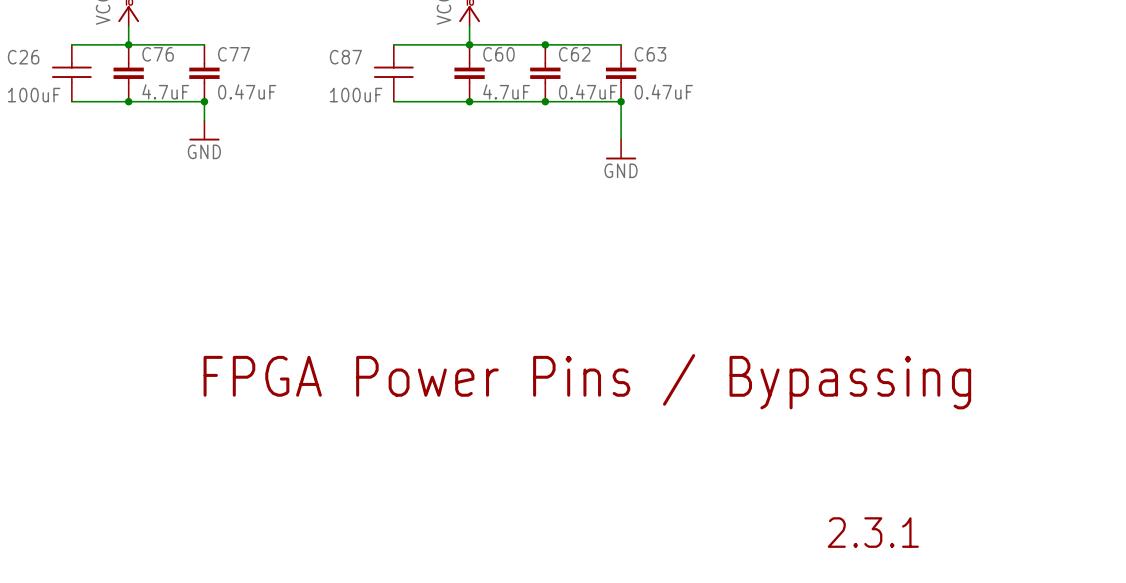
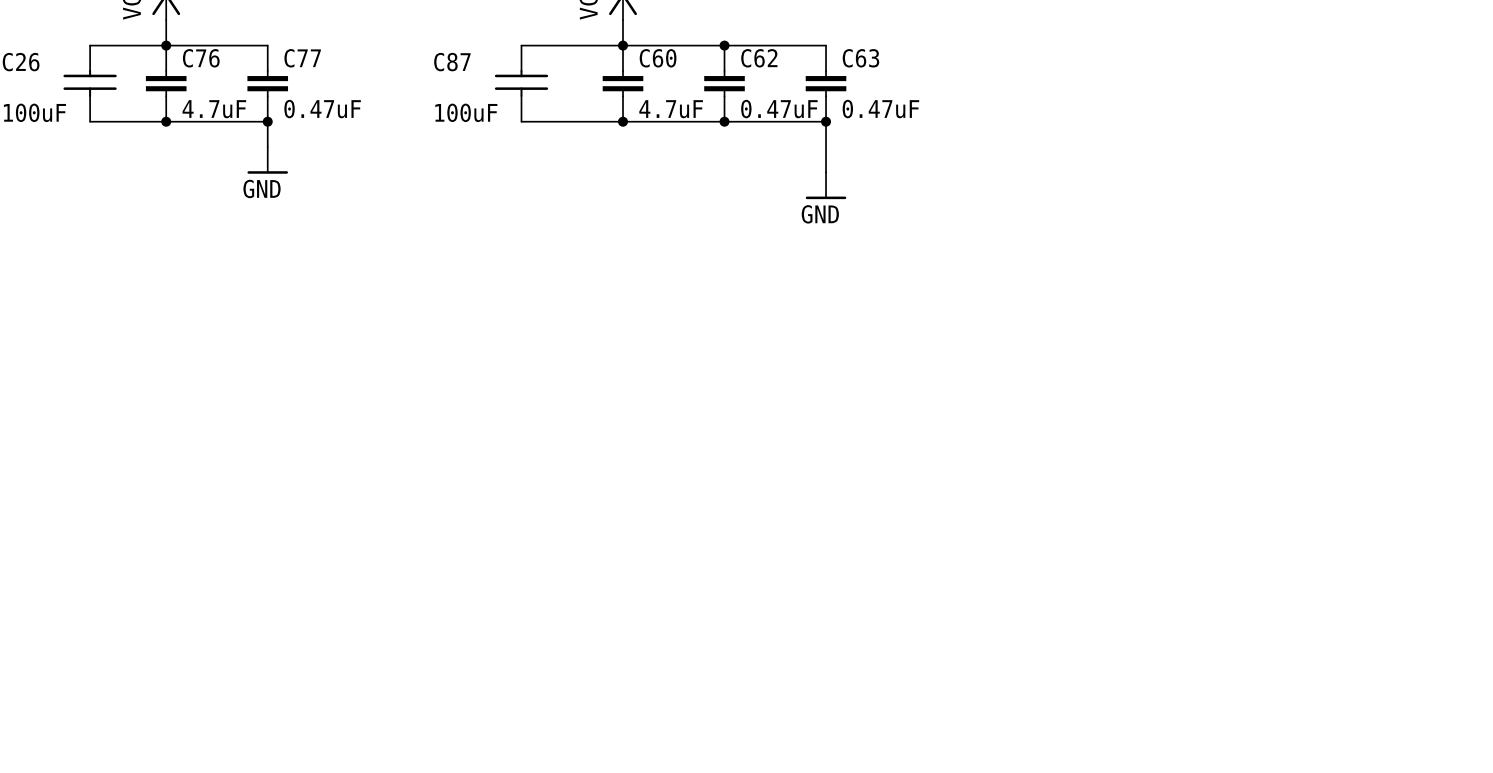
text: FPGA Power Pins / Bypassing (587, 381) -> none
text: 2.3.1 (873, 532) -> none

